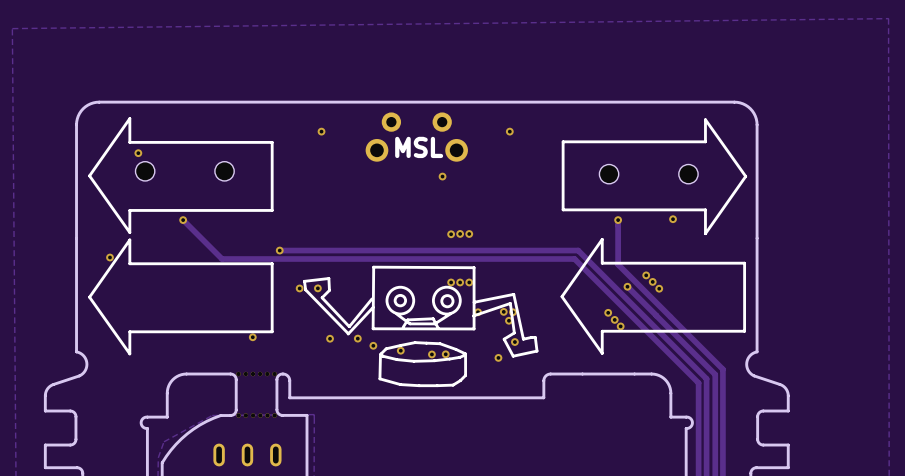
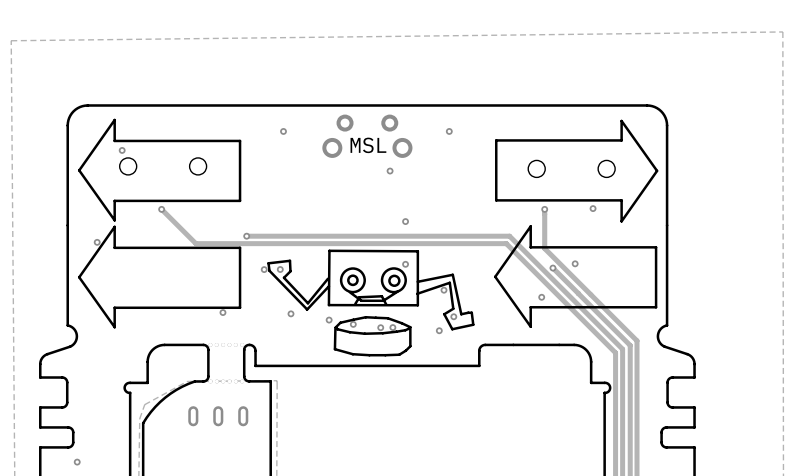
via: (469, 233) -> none
via: (451, 234) -> none
via: (646, 275) -> none
via: (451, 282) -> none
via: (469, 282) -> none
via: (659, 288) -> none
via: (478, 312) -> none
via: (512, 312) -> none
via: (608, 312) -> none
via: (508, 320) -> none
via: (620, 326) -> none
via: (357, 338) -> none

